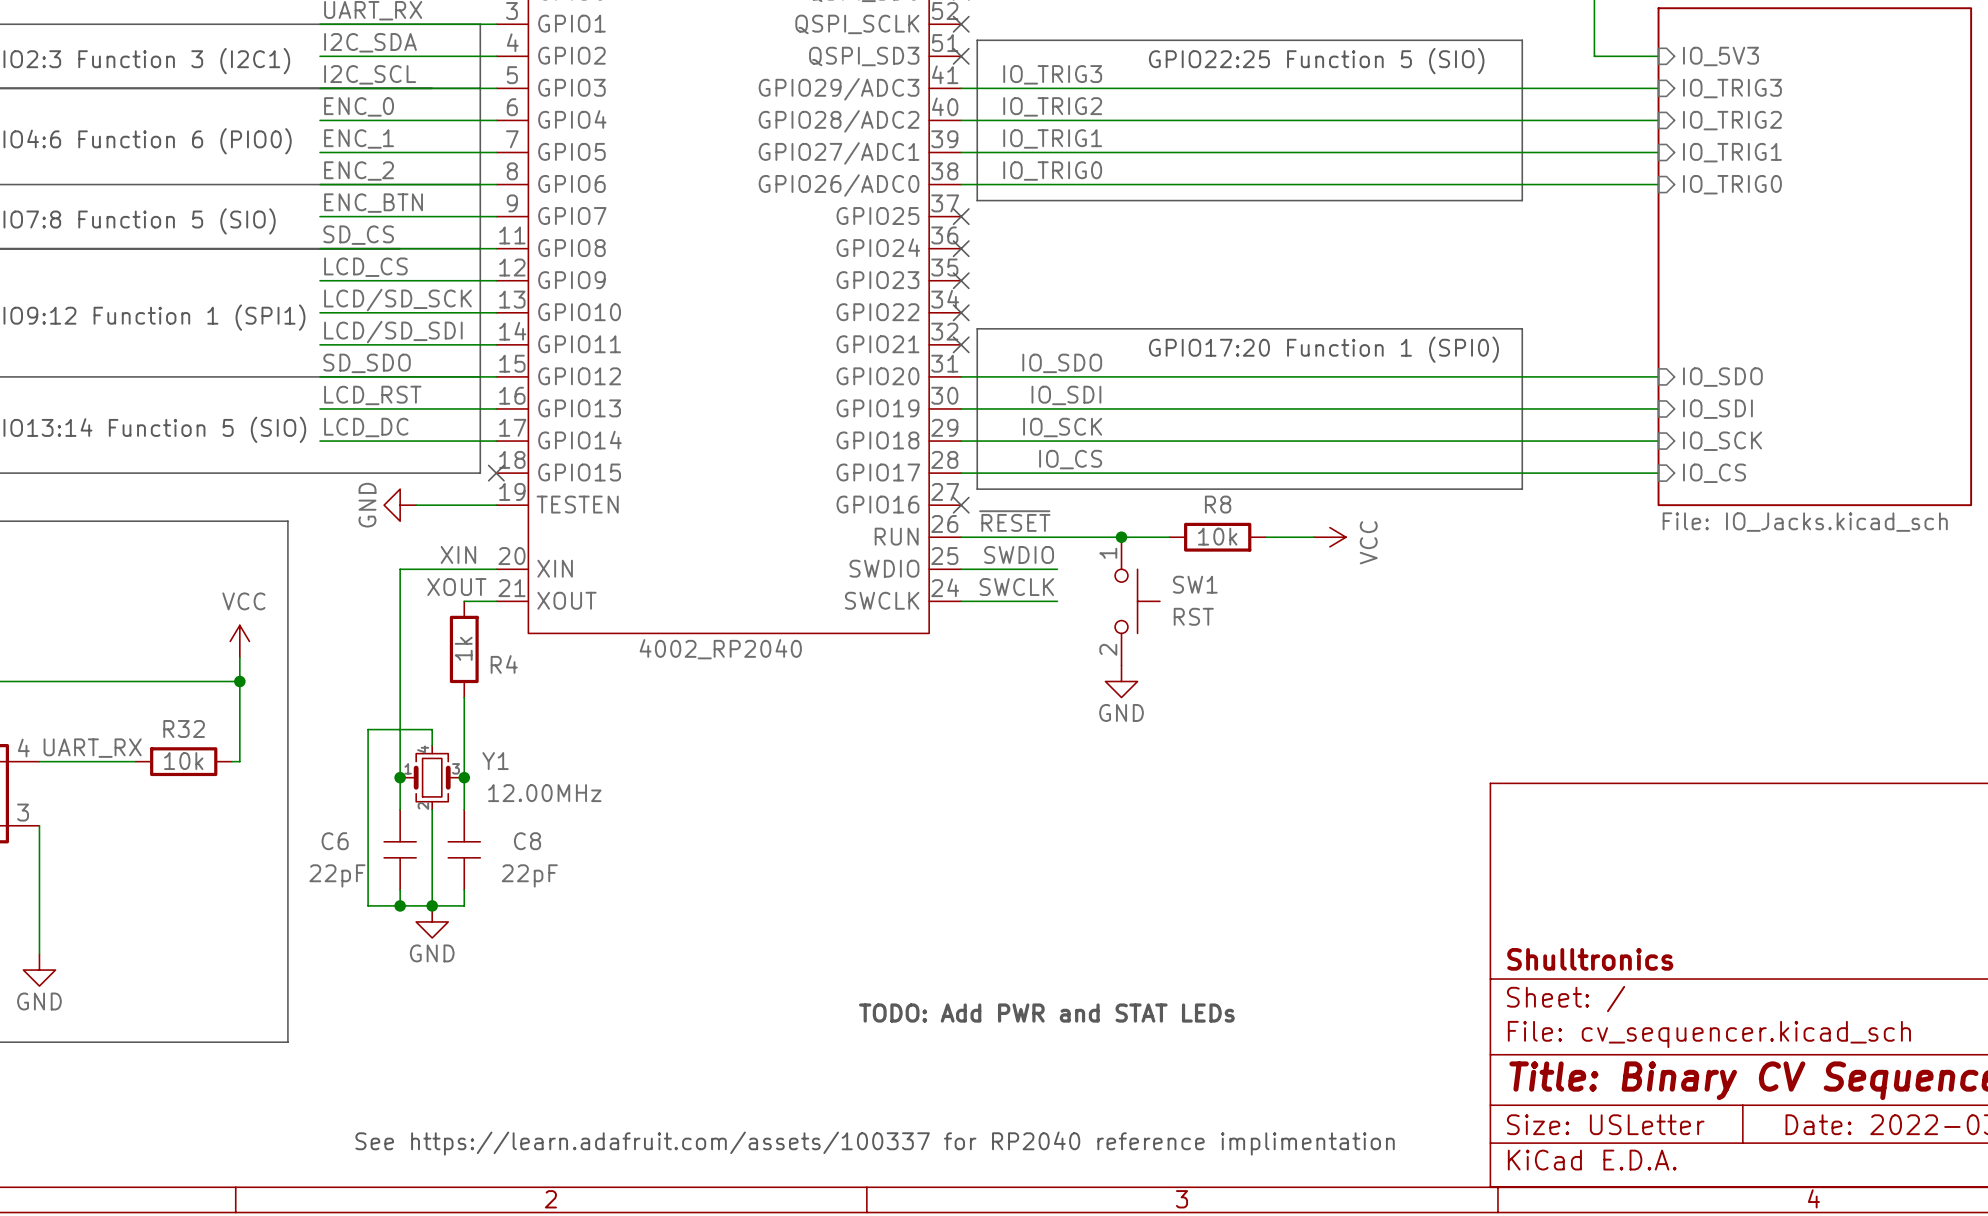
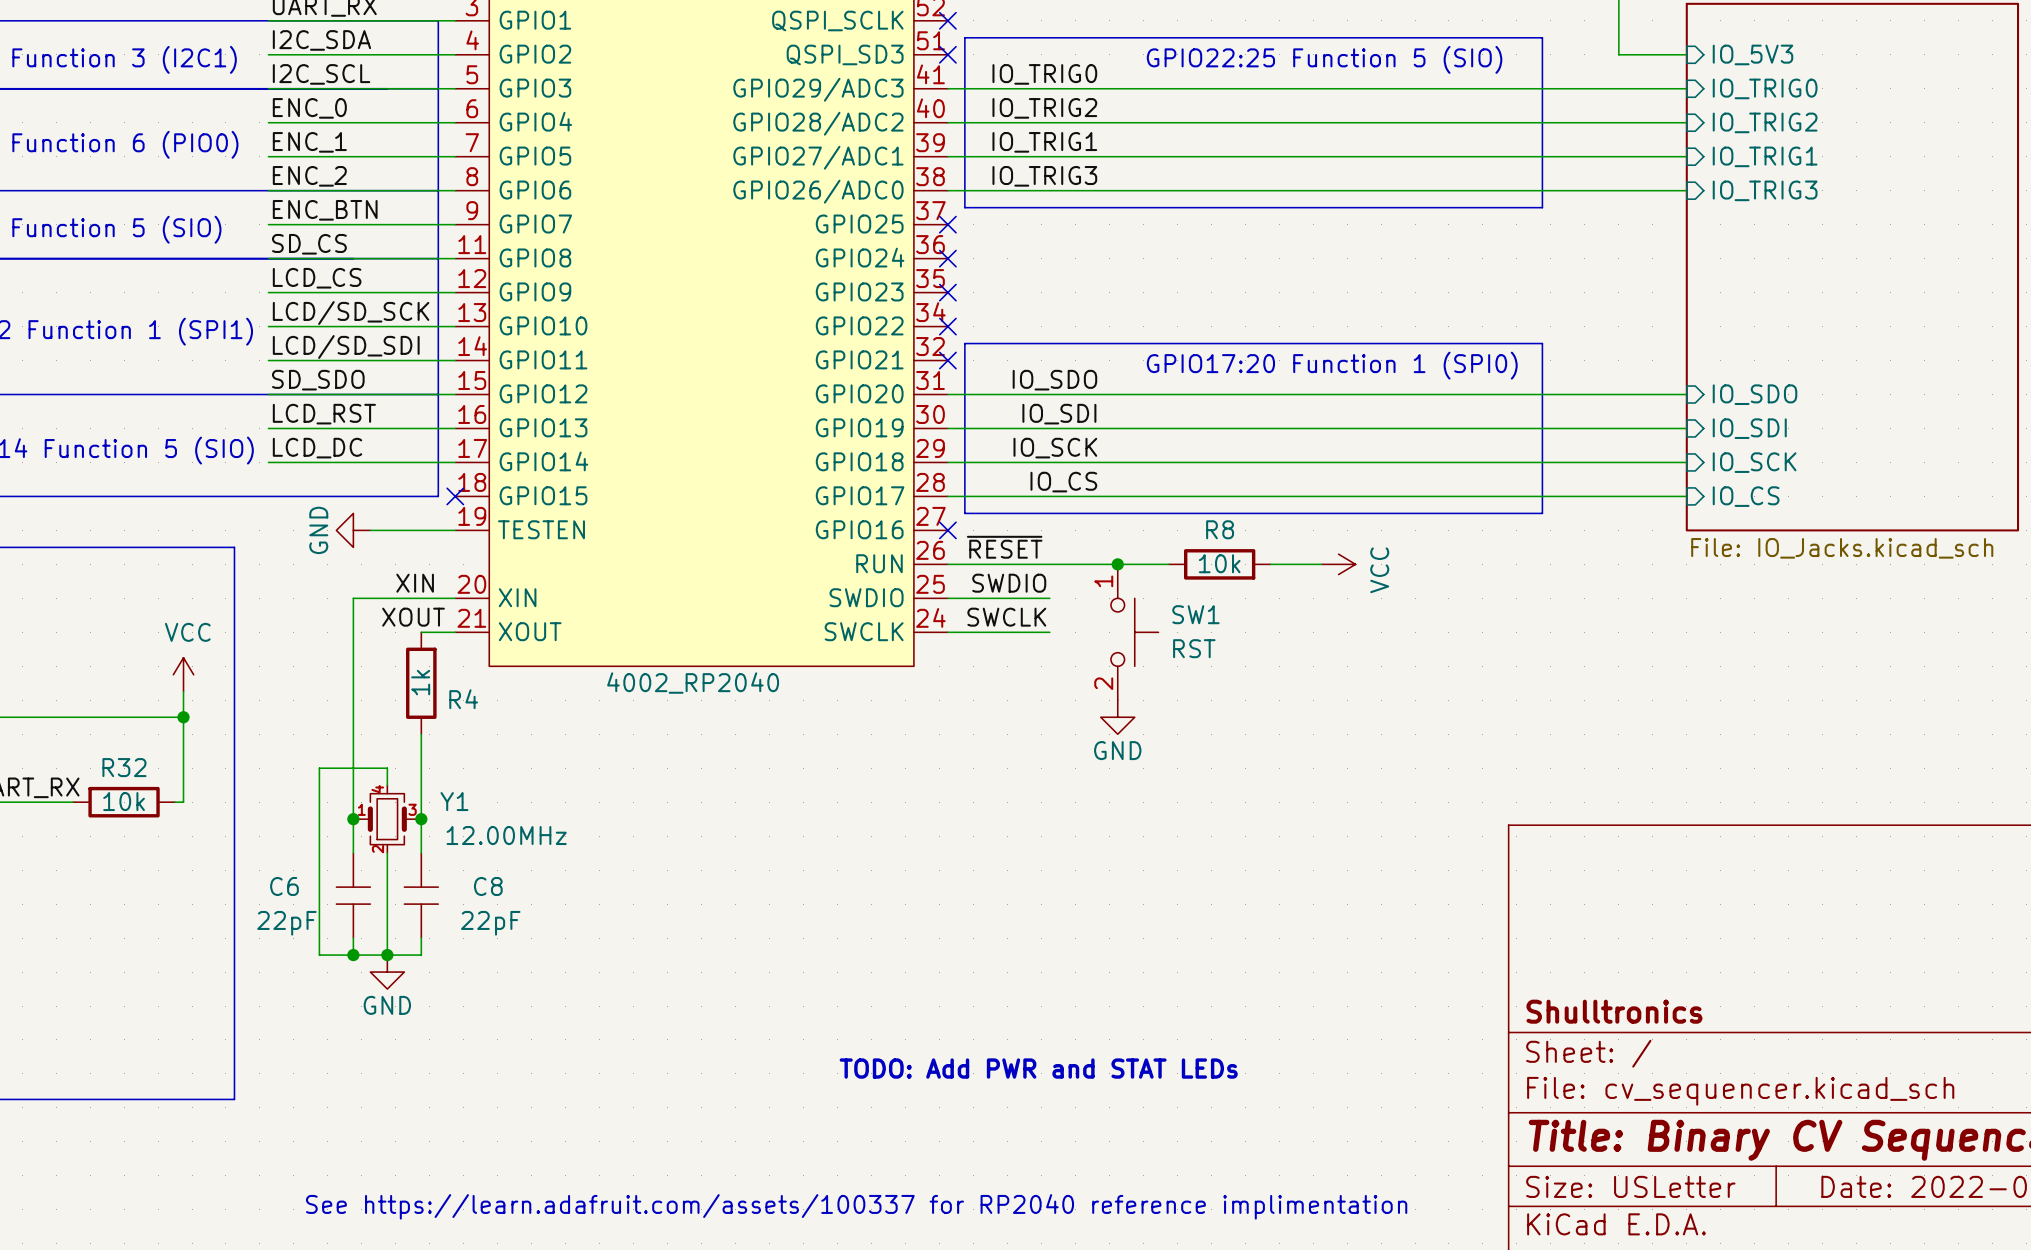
label: IO_TRIG3 (1052, 74) -> IO_TRIG0 (1044, 74)
sheet pin: IO_TRIG3 (1732, 88) -> IO_TRIG0 (1765, 88)
label: IO_TRIG0 (1052, 171) -> IO_TRIG3 (1044, 176)
sheet pin: IO_TRIG0 (1732, 184) -> IO_TRIG3 (1765, 190)

